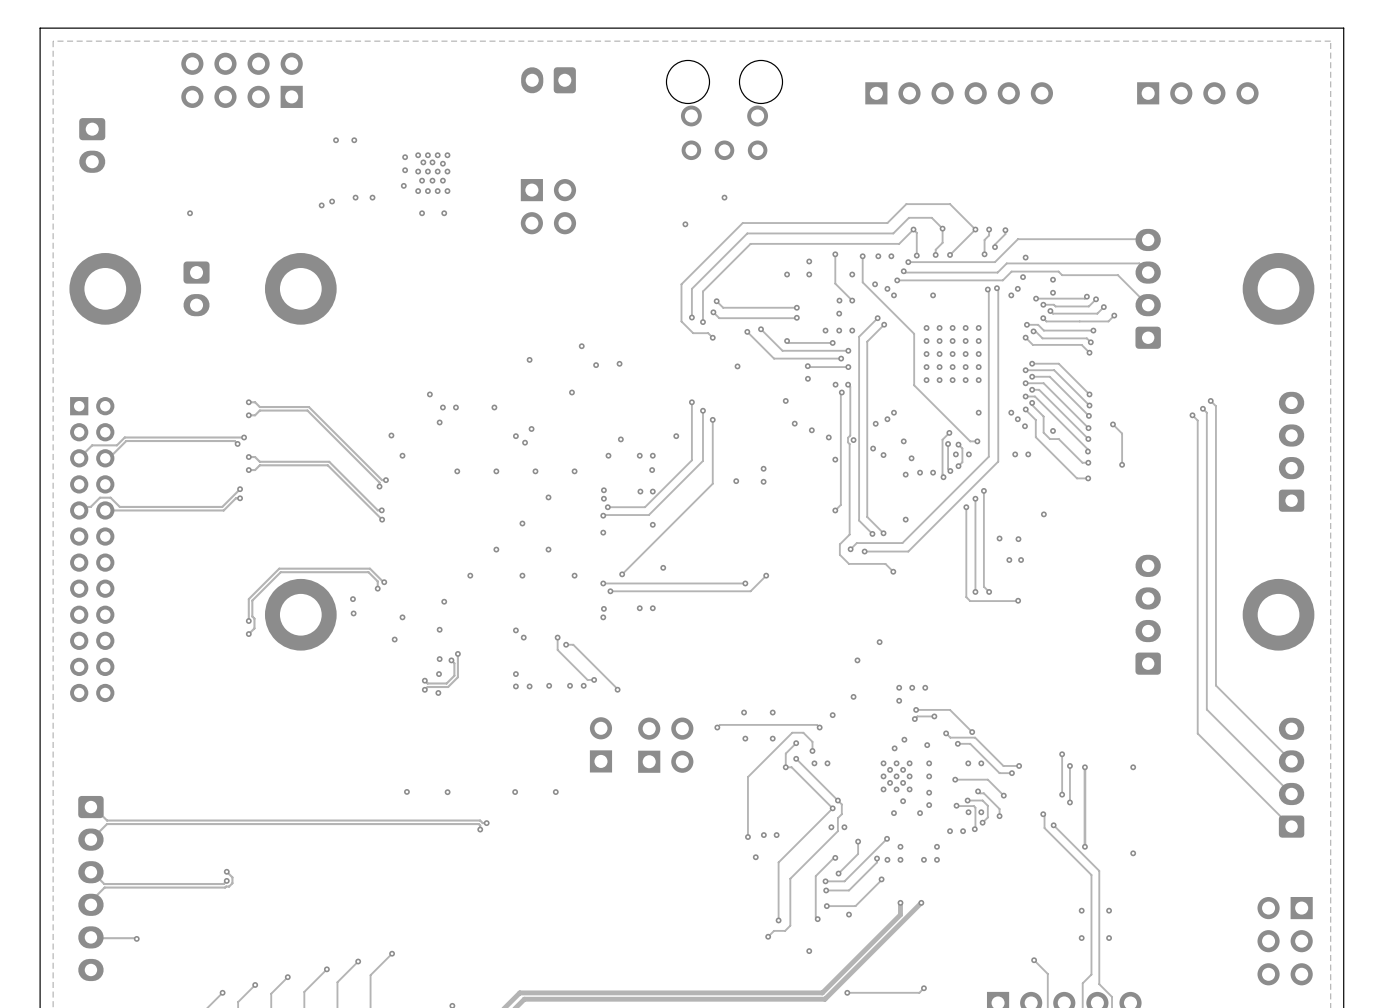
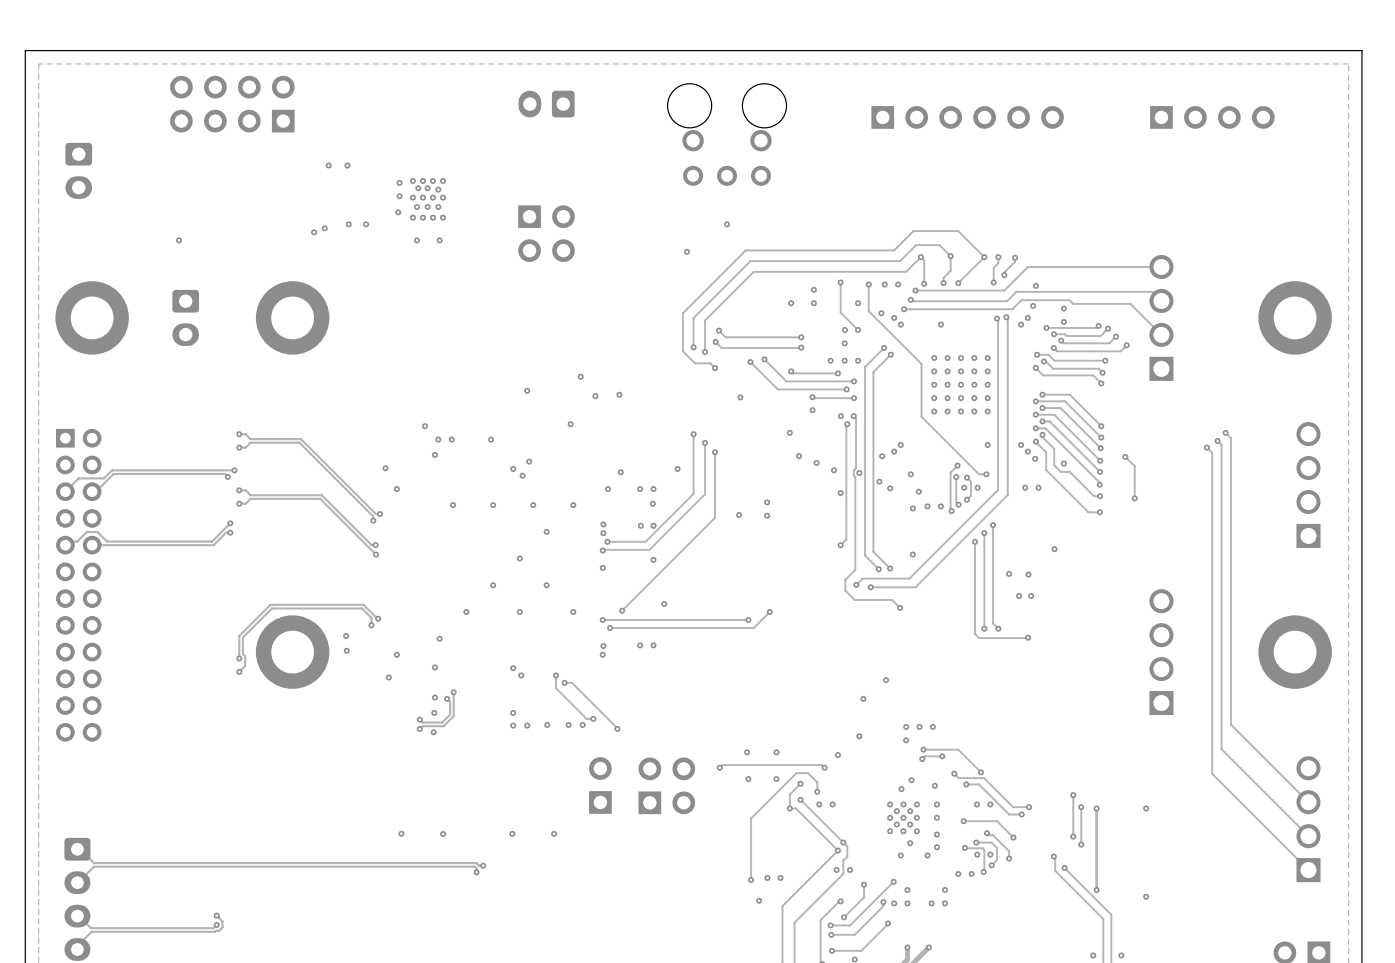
part footprint: [1135, 228, 1161, 349] -> [1149, 254, 1174, 381]
part footprint: [1278, 391, 1305, 512] -> [1296, 422, 1321, 548]
part footprint: [1135, 554, 1161, 675] -> [1149, 589, 1174, 716]
part footprint: [1278, 717, 1305, 838] -> [1296, 756, 1321, 883]

